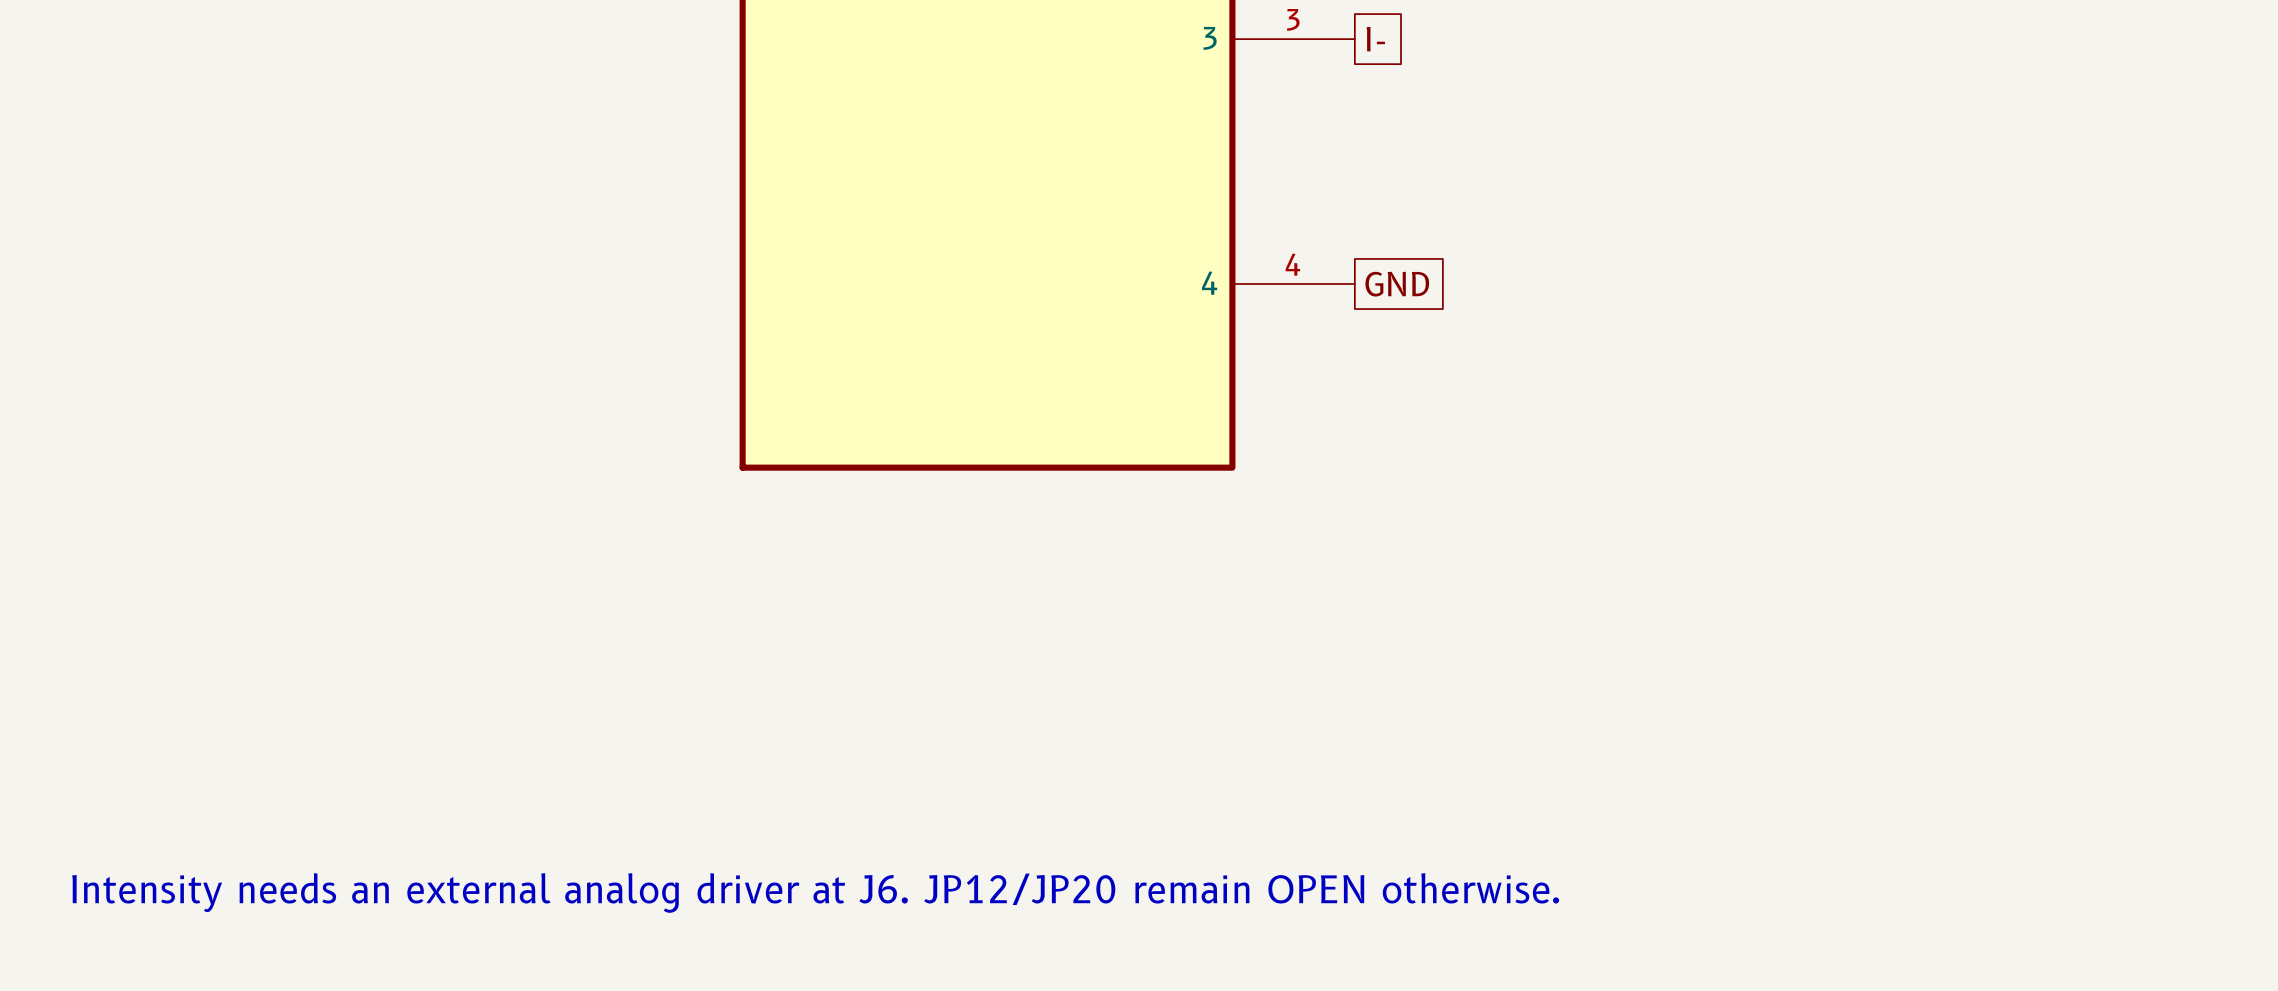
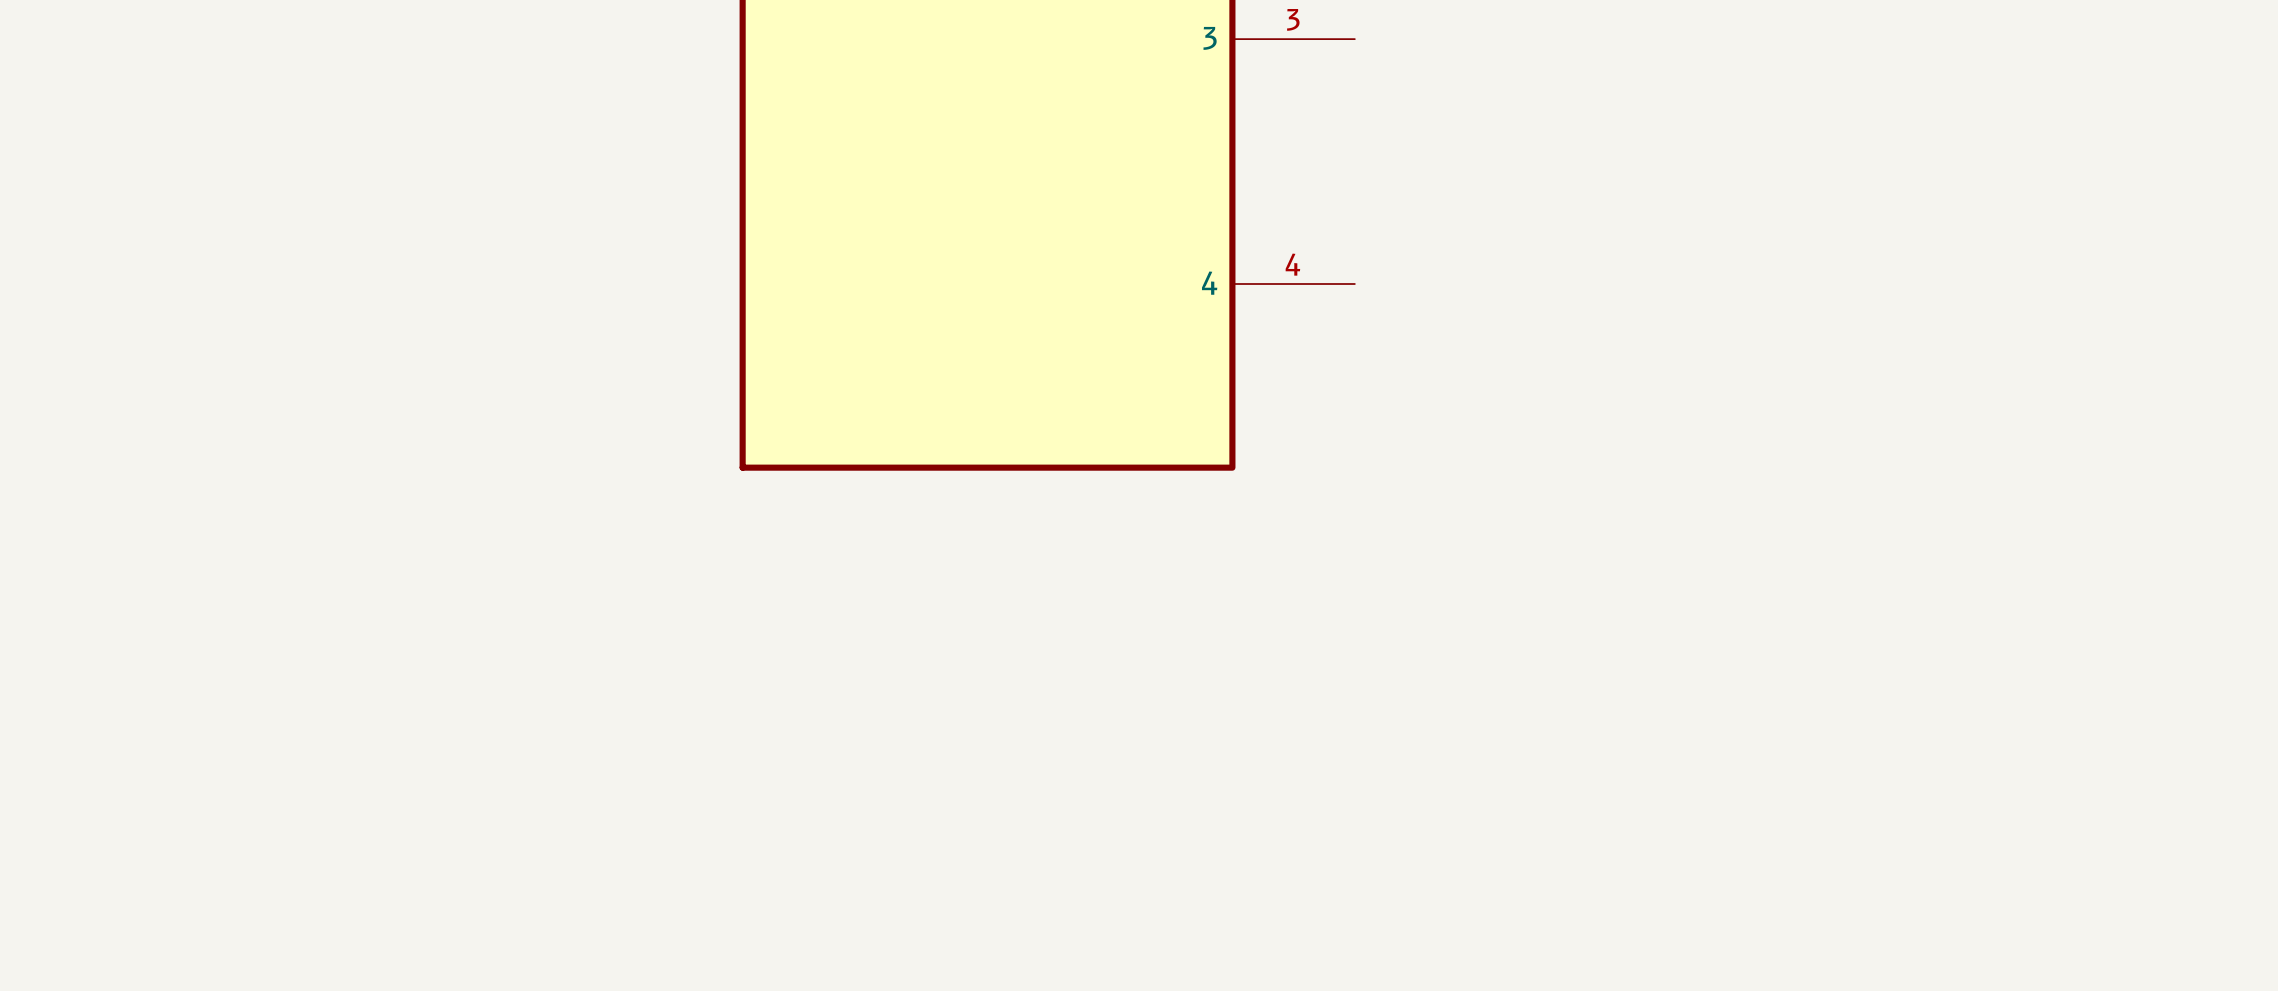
global label: I- (1375, 39) -> none
global label: GND (1397, 284) -> none
text: Intensity needs an external analog driver at J6. JP12/JP20 remain OPEN otherwise. (815, 892) -> none

